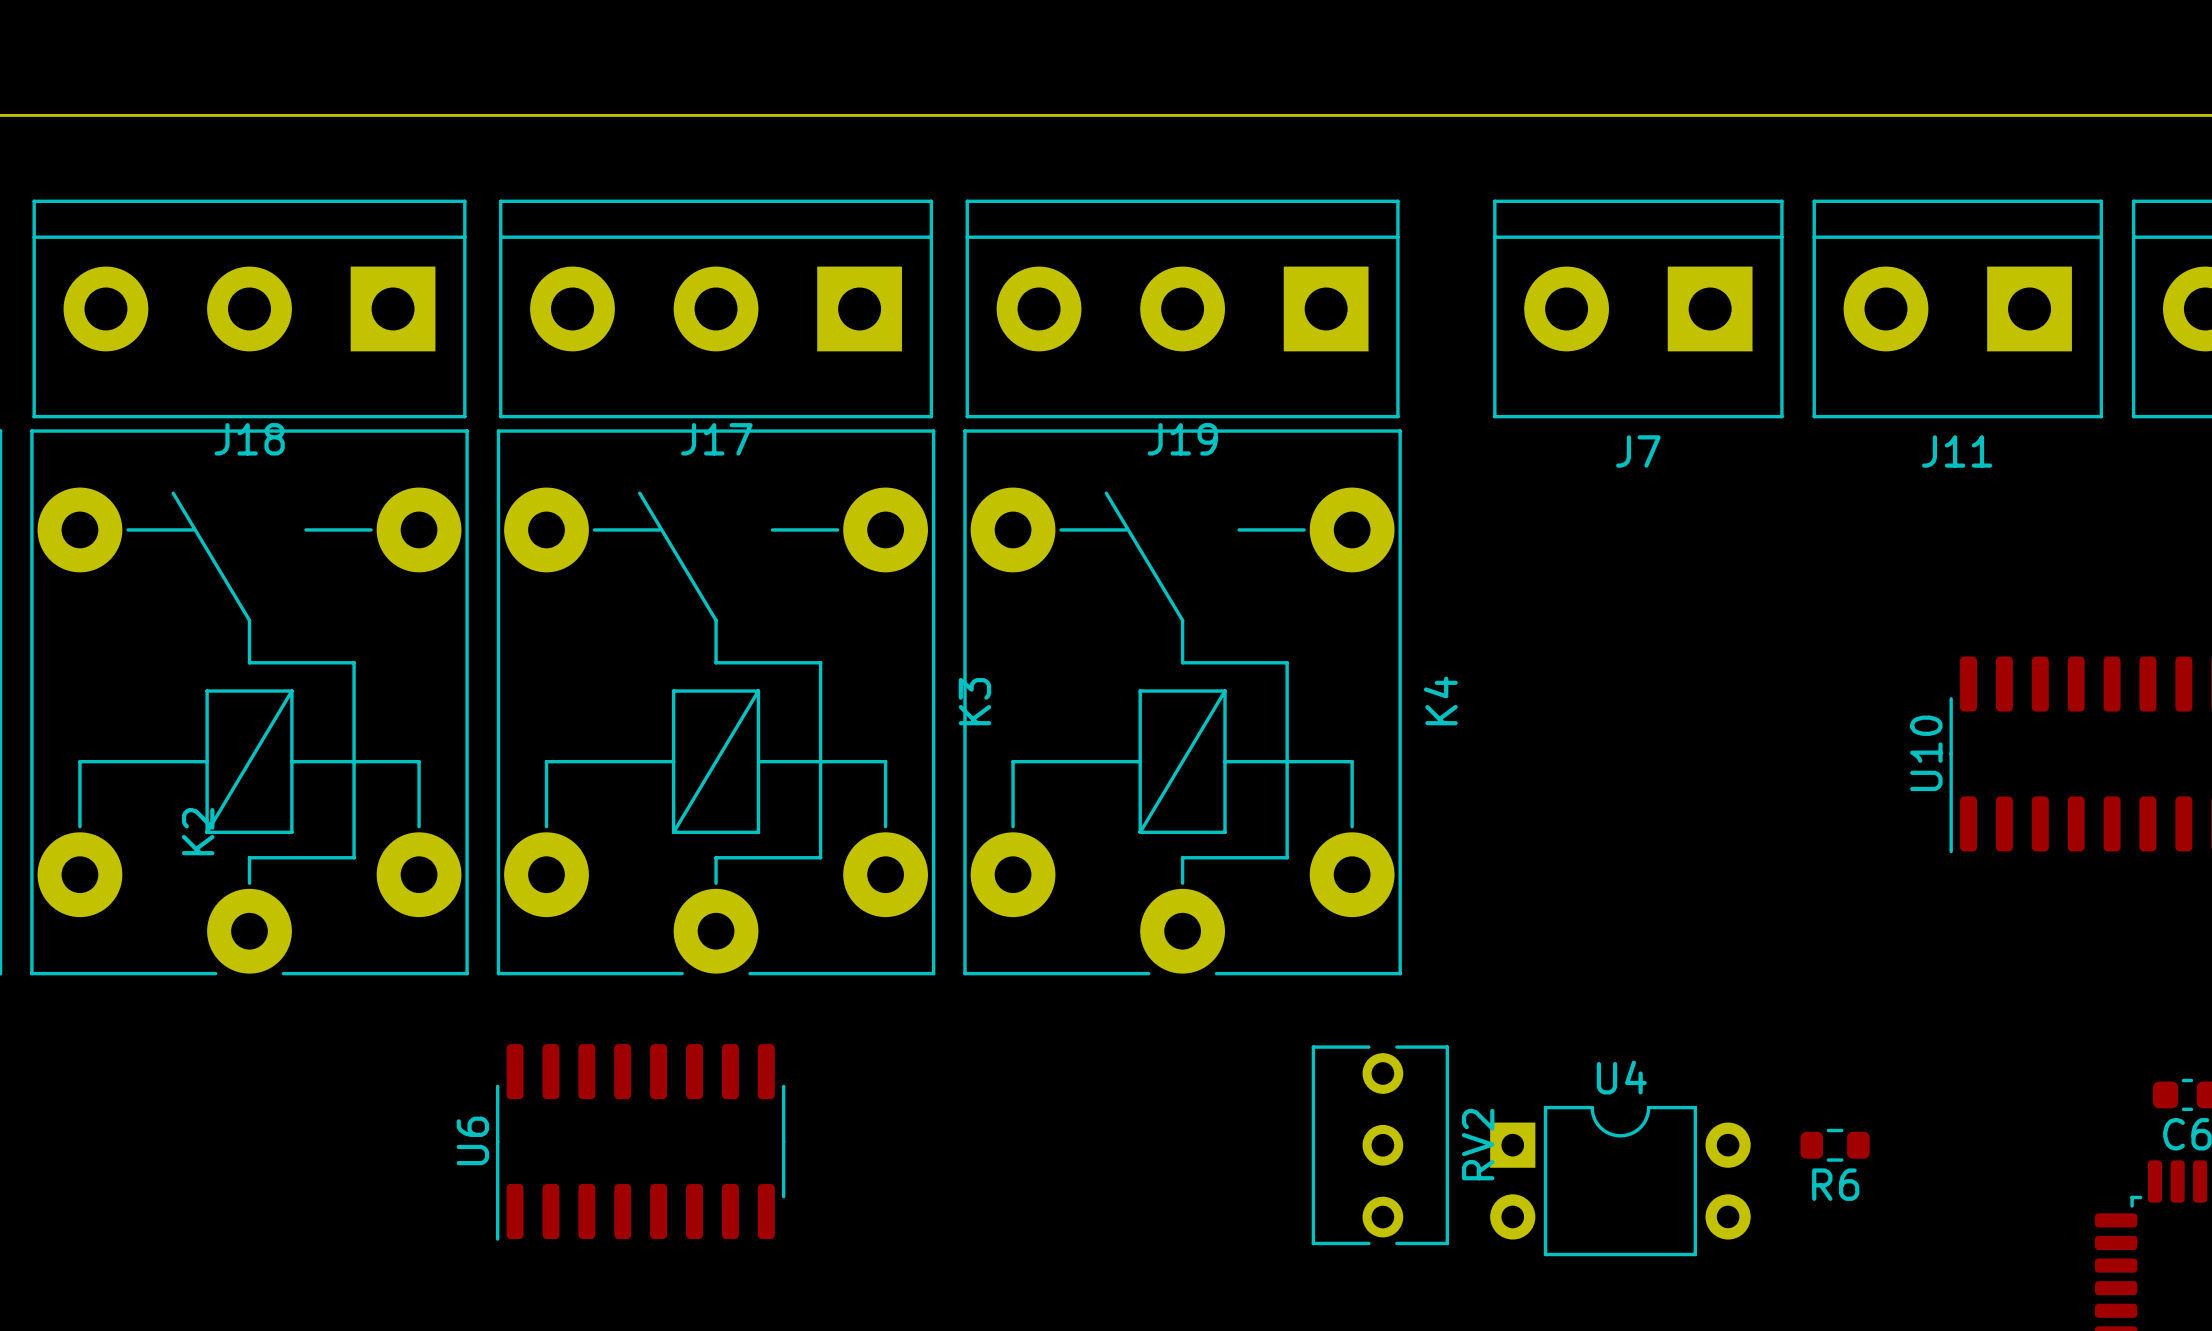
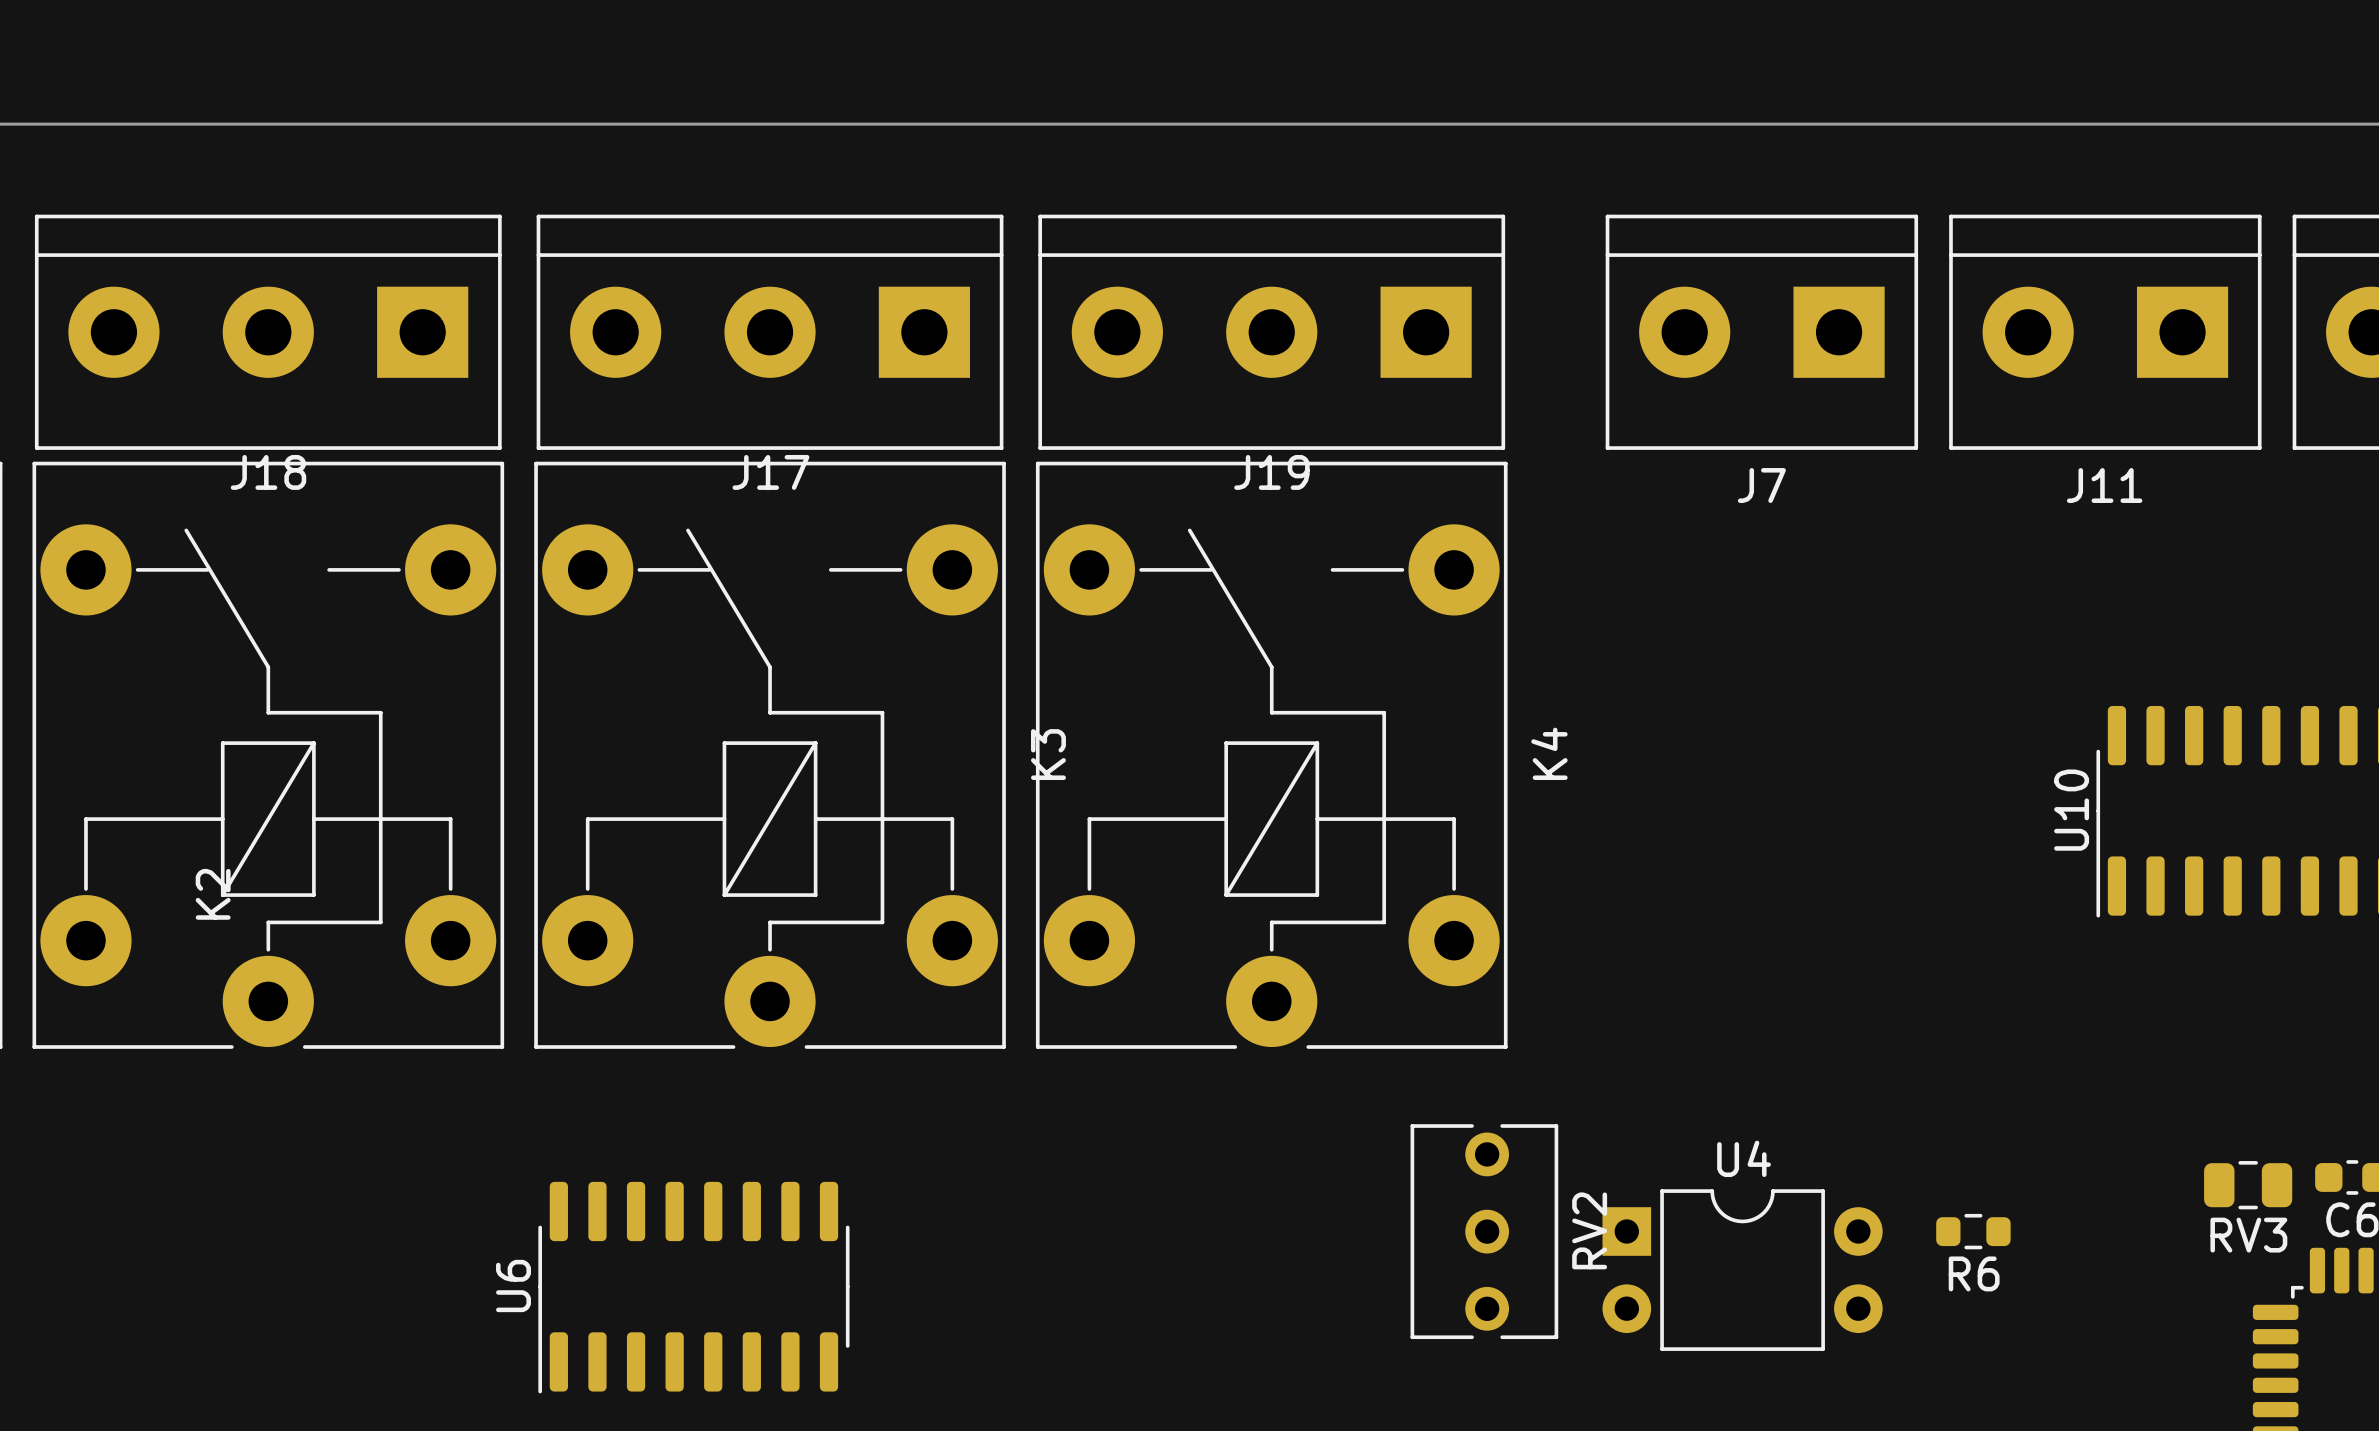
RV3: none -> (2248, 1185)
U6 position: (640, 1142) -> (693, 1287)

